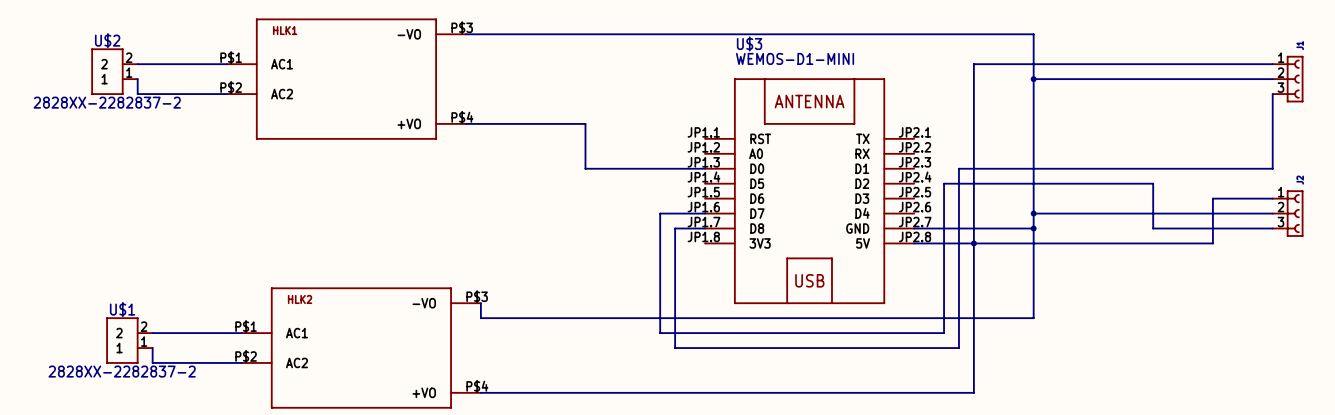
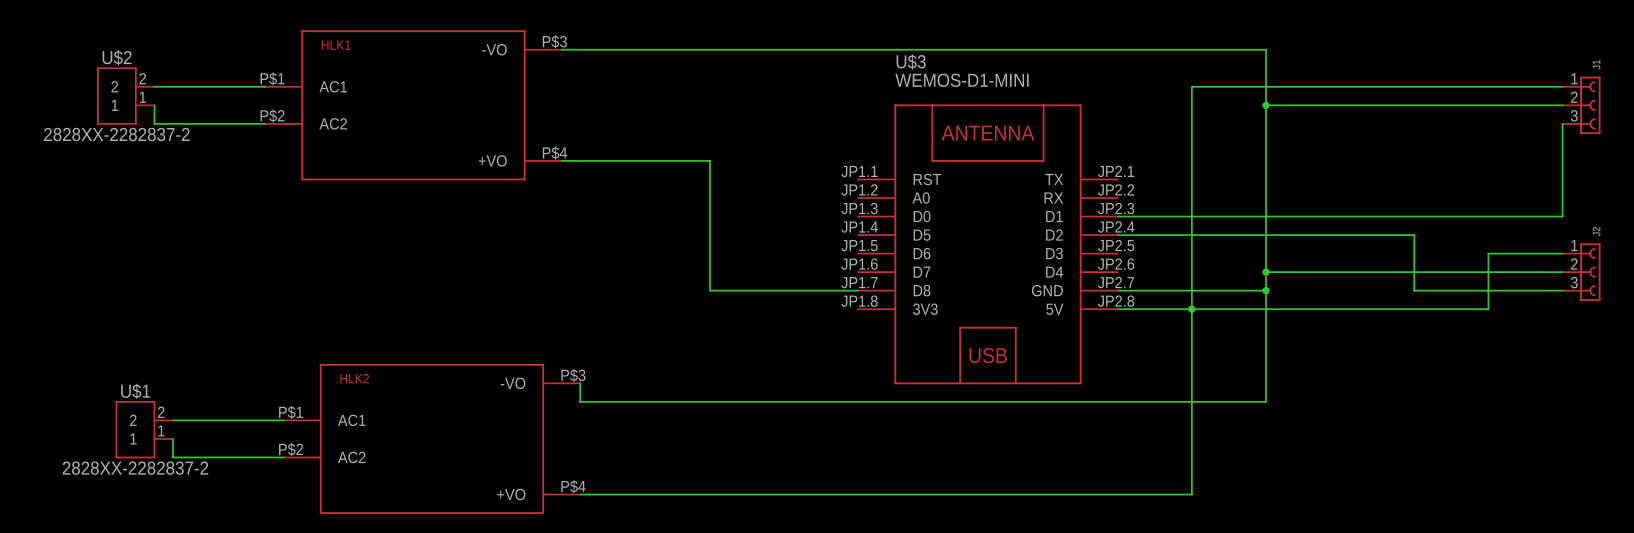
wire: (585, 168) (705, 168) -> (709, 216) (709, 290) (821, 290)
wire: (958, 168) (958, 348) (675, 348) (675, 228) -> (1173, 216) (1117, 216)
wire: (944, 183) (944, 333) (660, 333) (660, 213) (705, 213) -> (1154, 235) (1117, 235)

